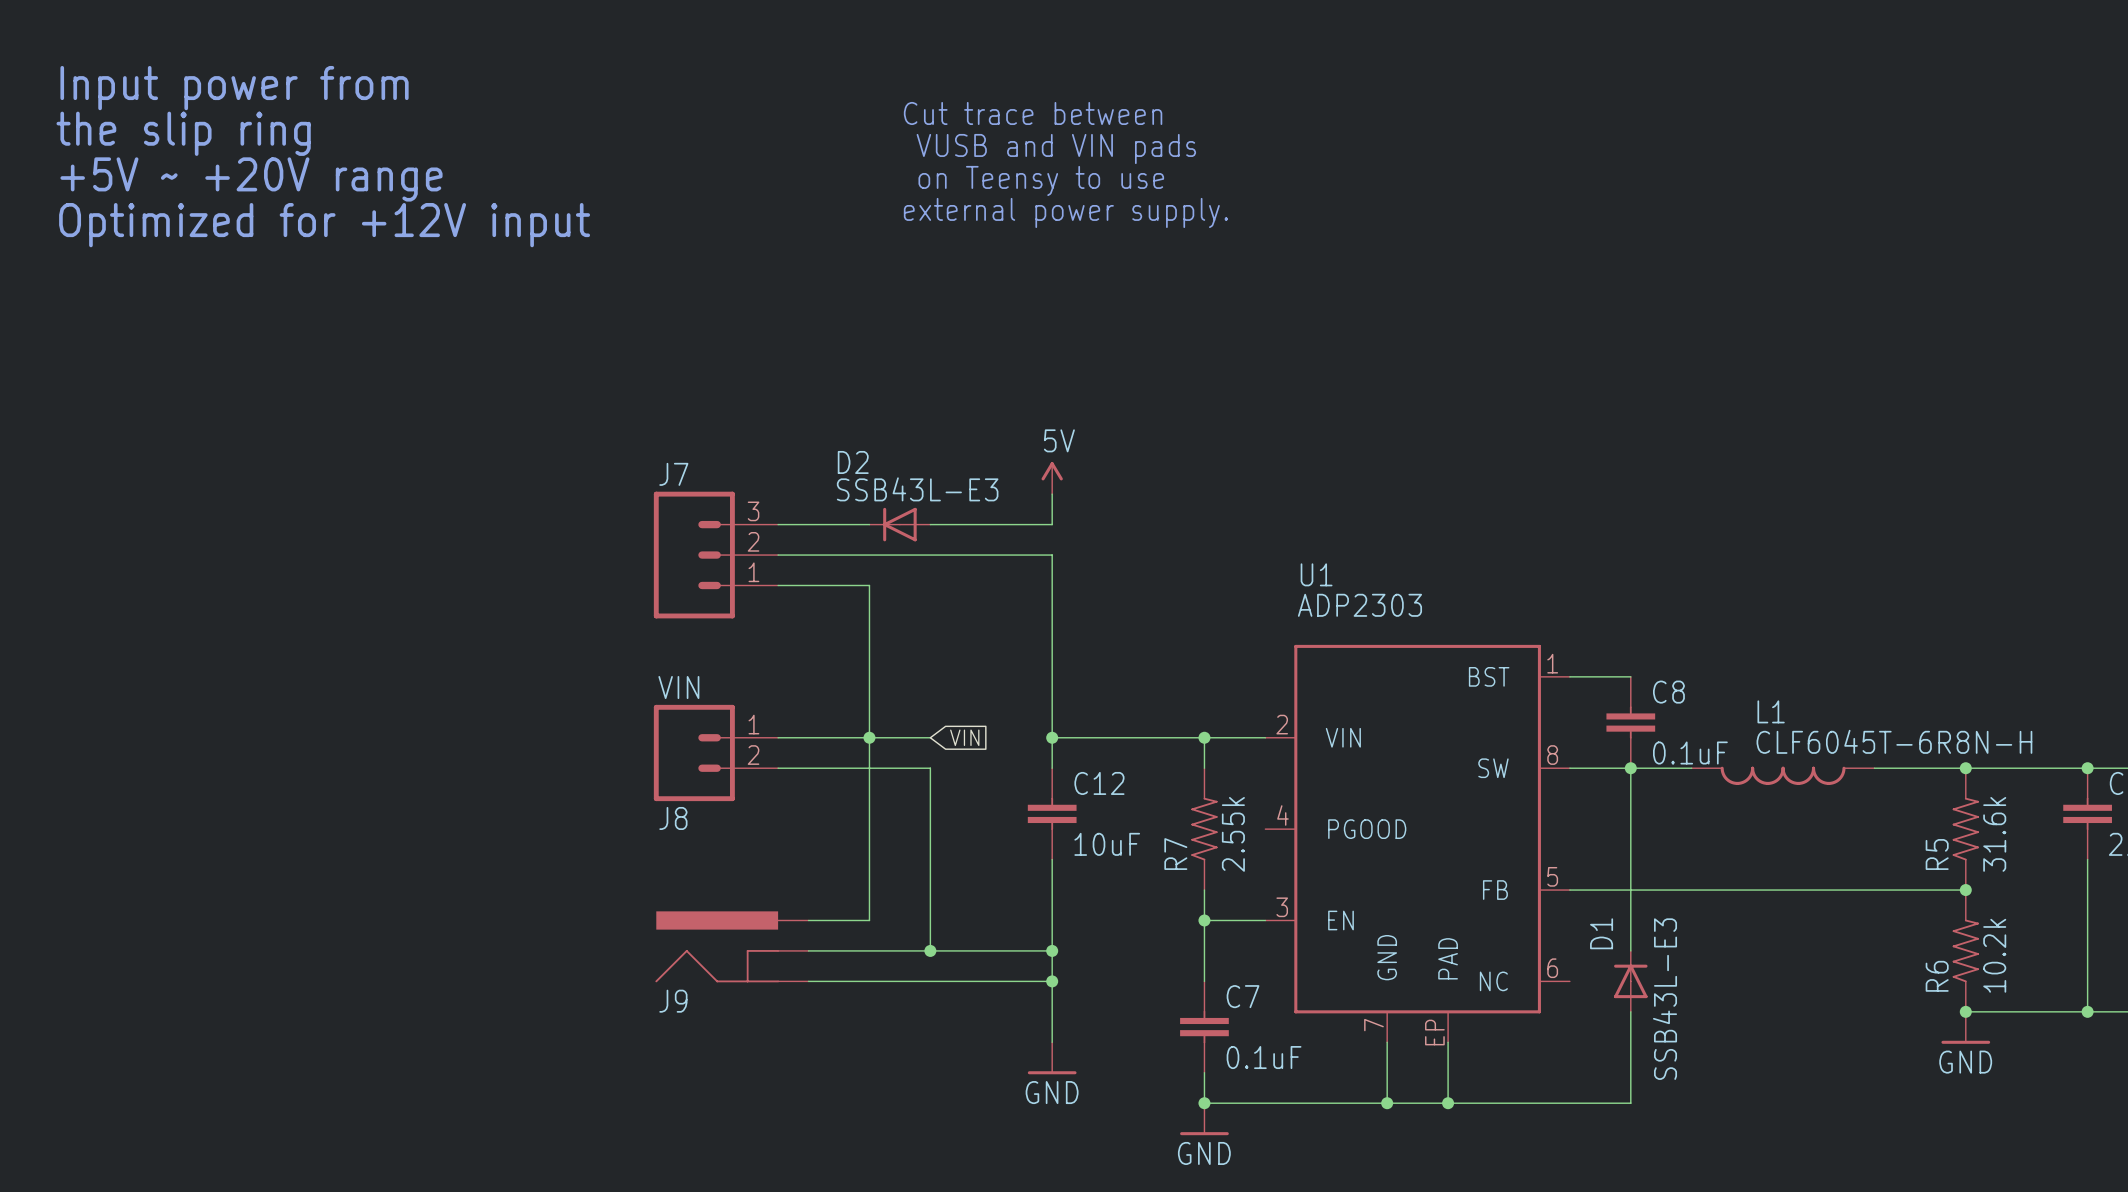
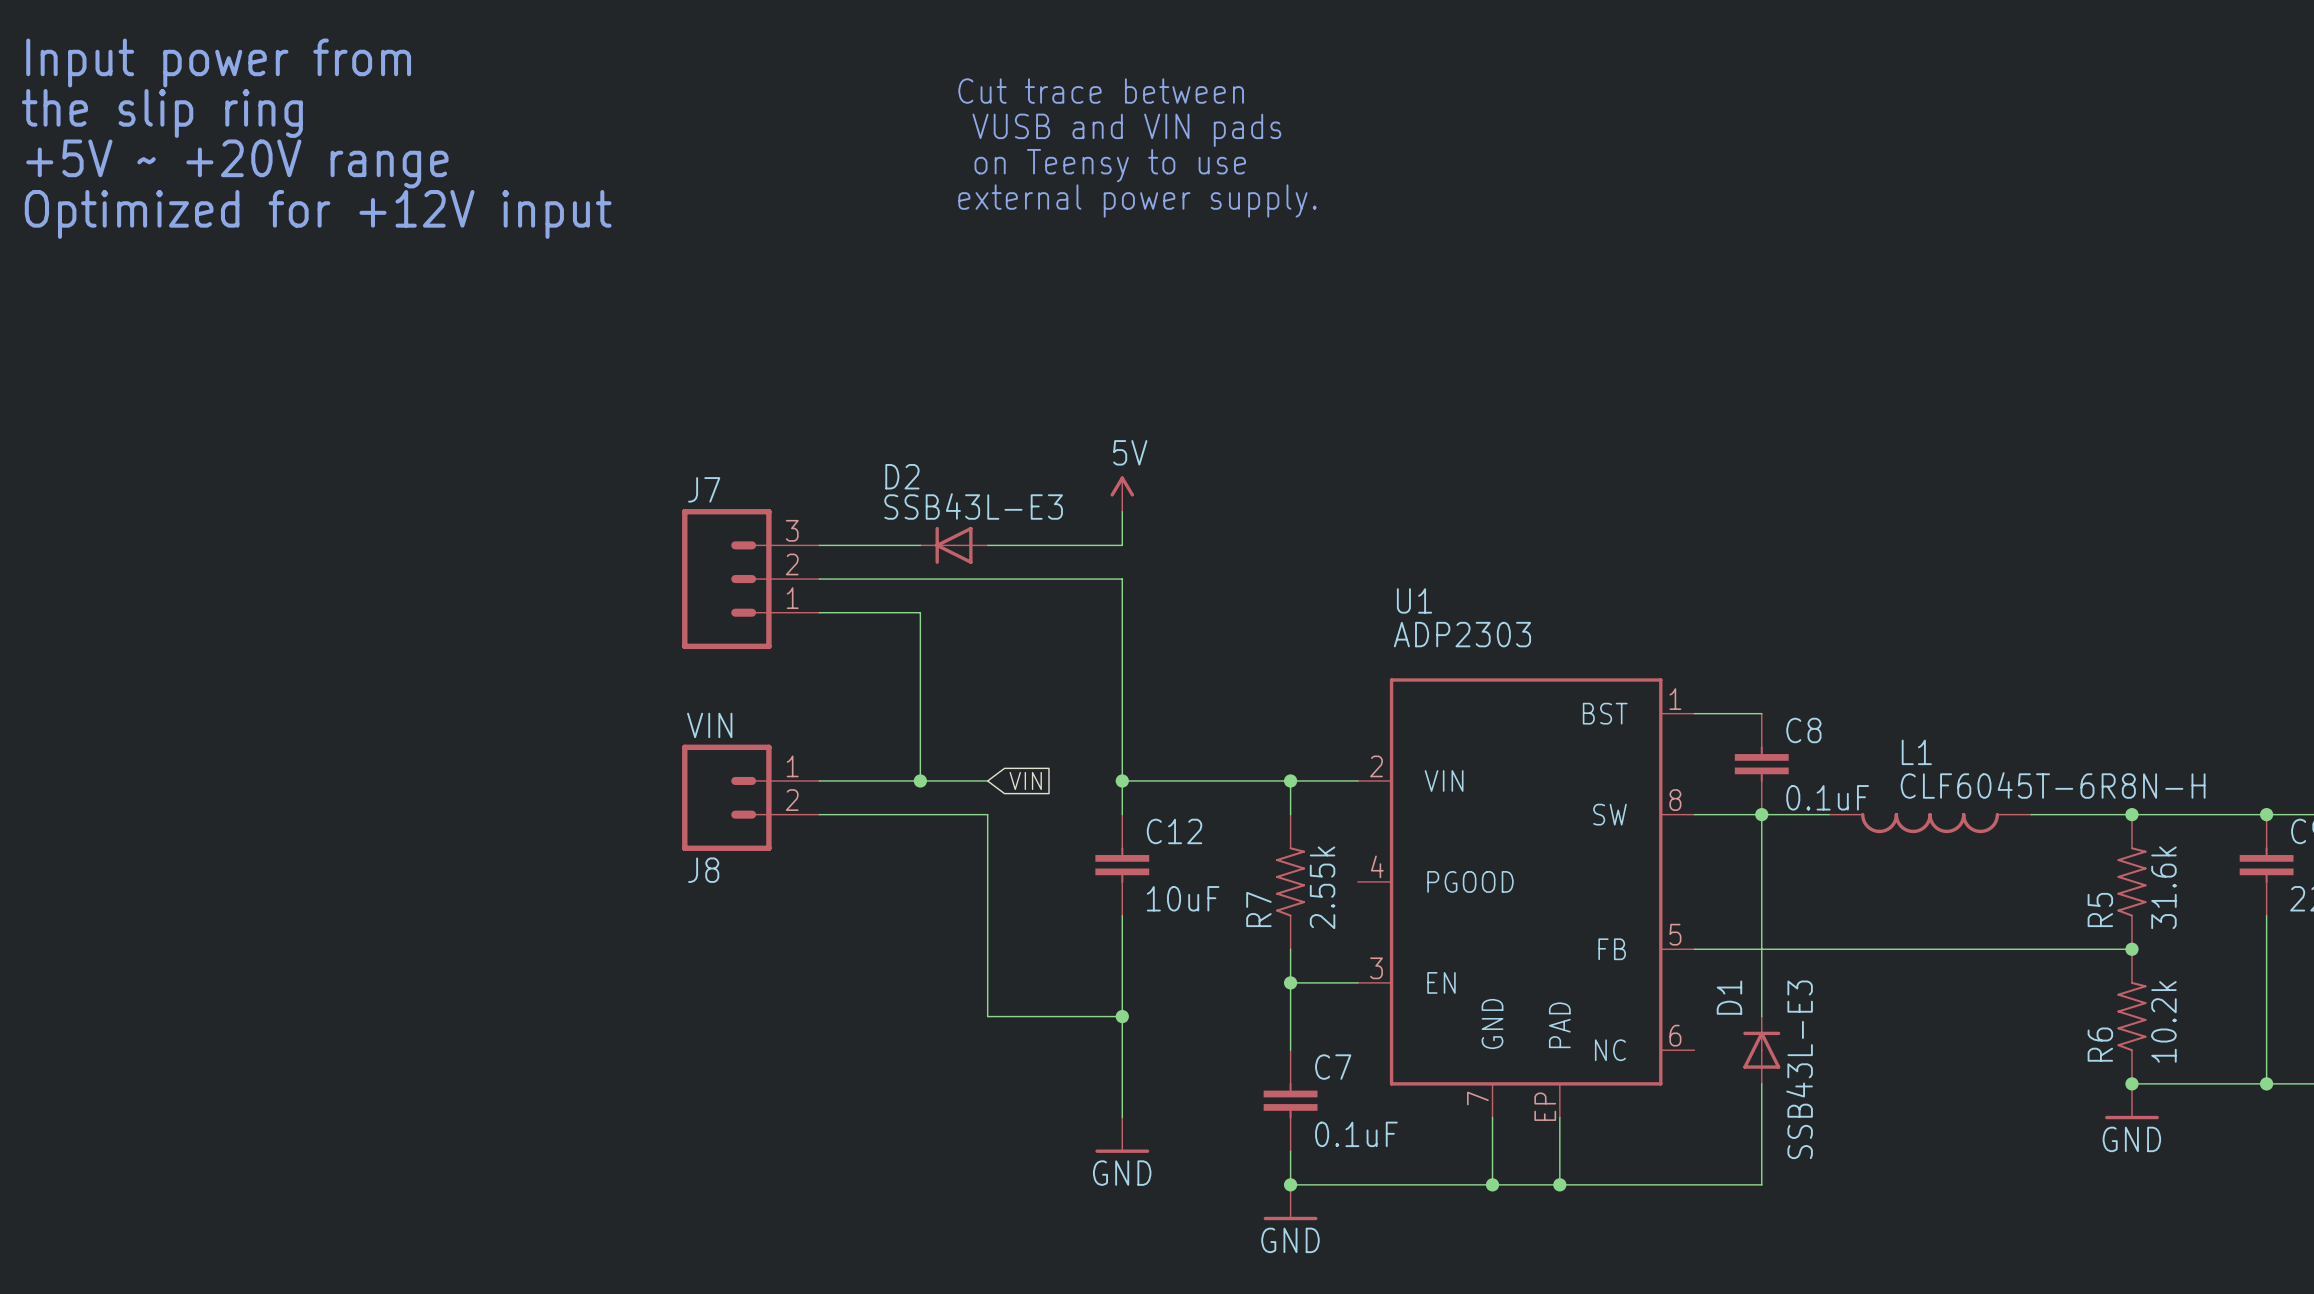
wire: (869, 737) (869, 920) (808, 920) -> none
J9: (731, 946) -> none
wire: (808, 950) (930, 950) -> none
junction: (930, 950) -> none
wire: (808, 981) (1052, 981) -> none
junction: (1052, 981) -> none

